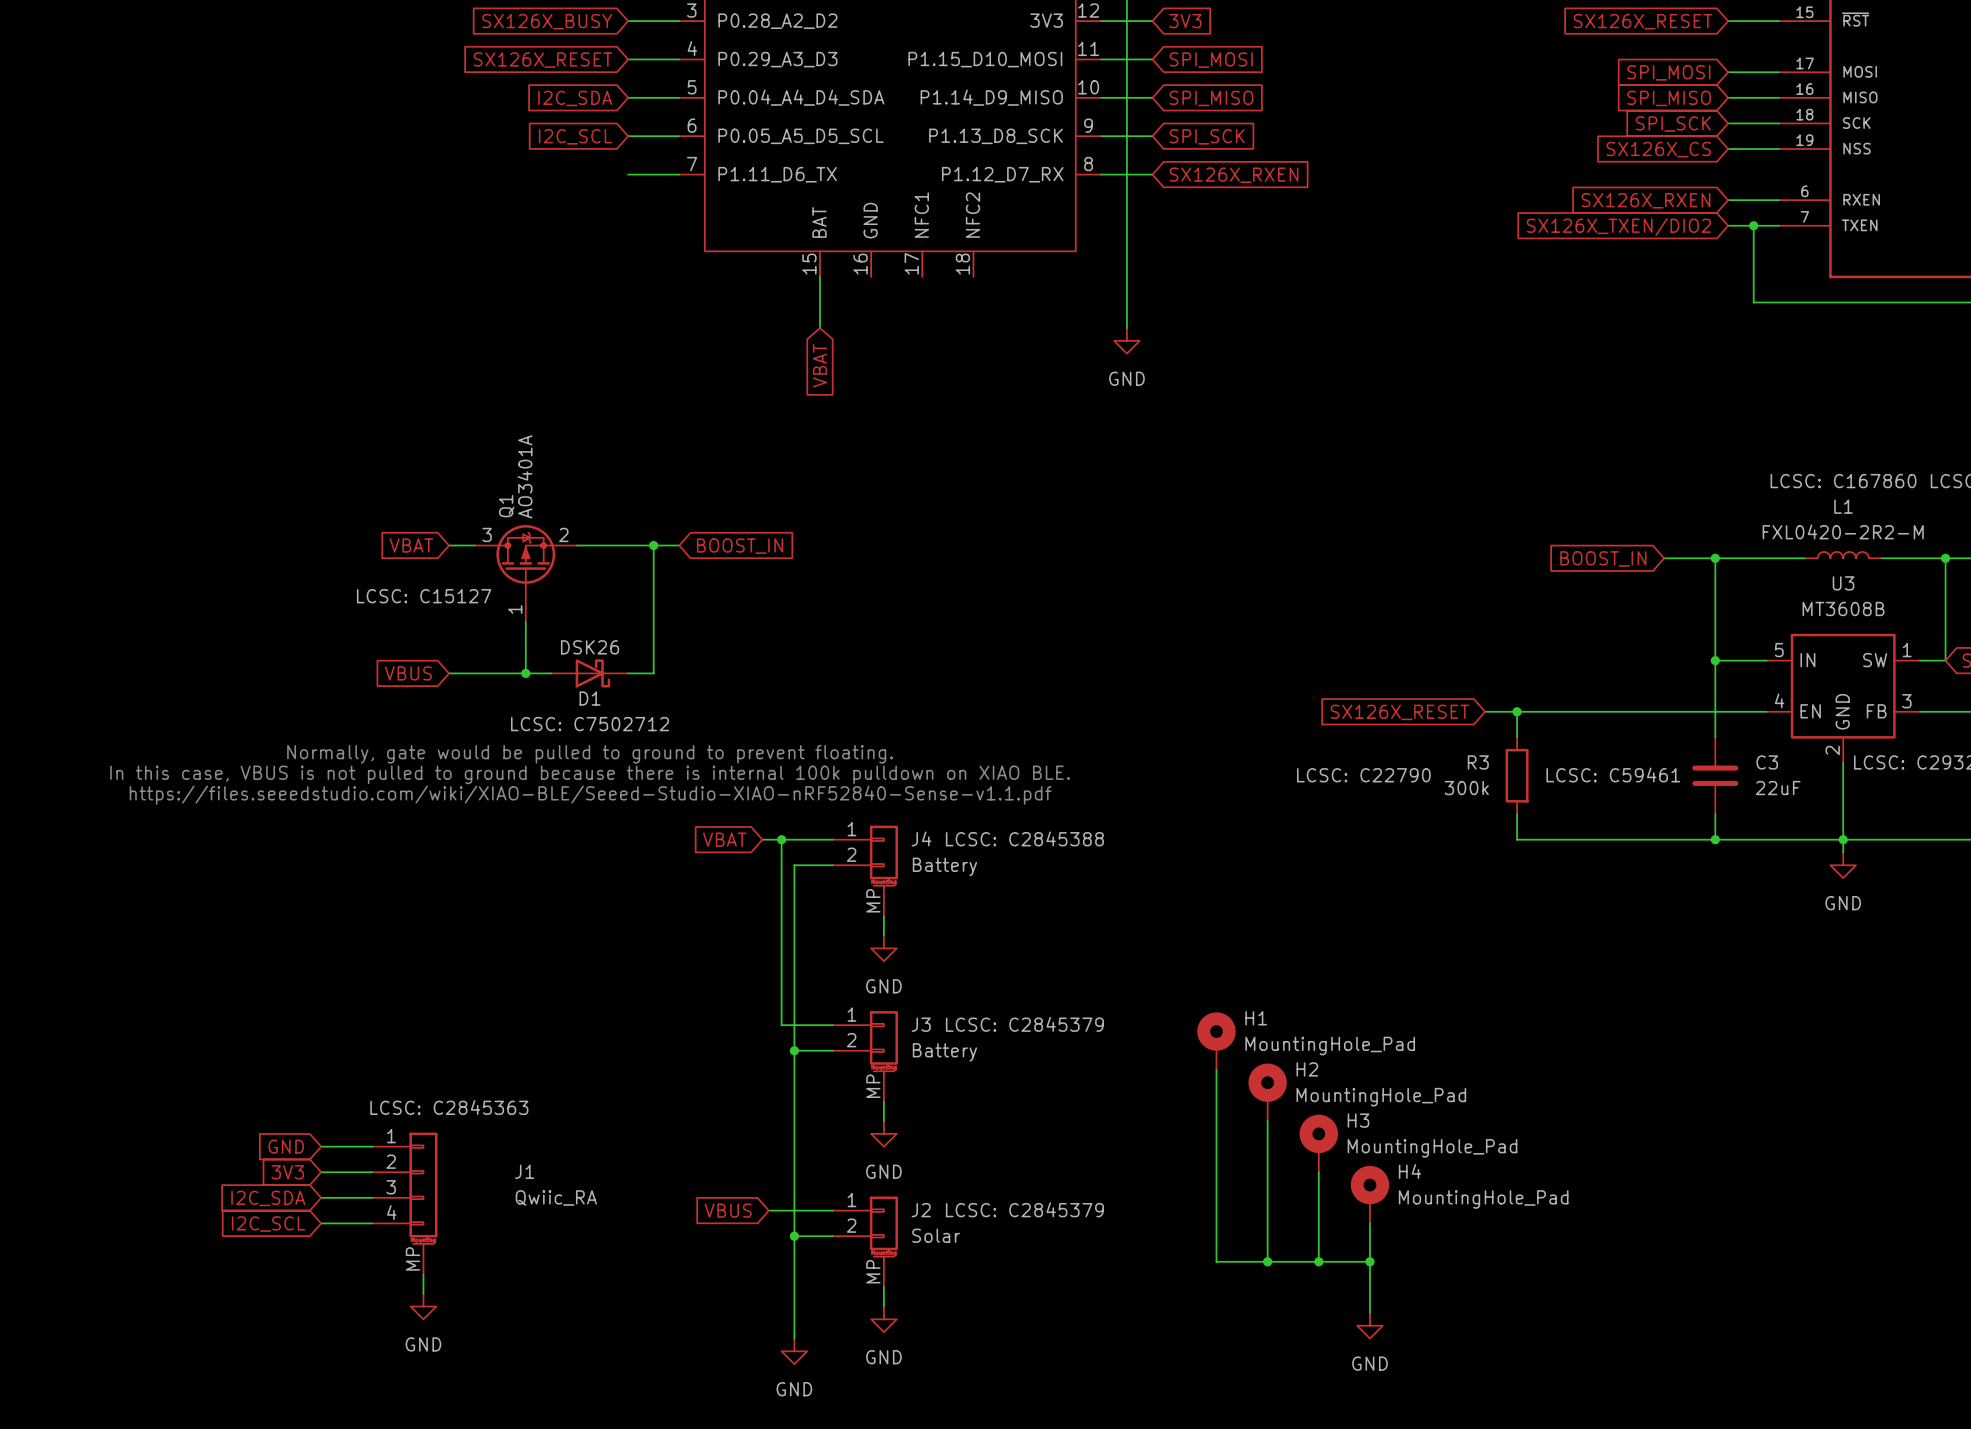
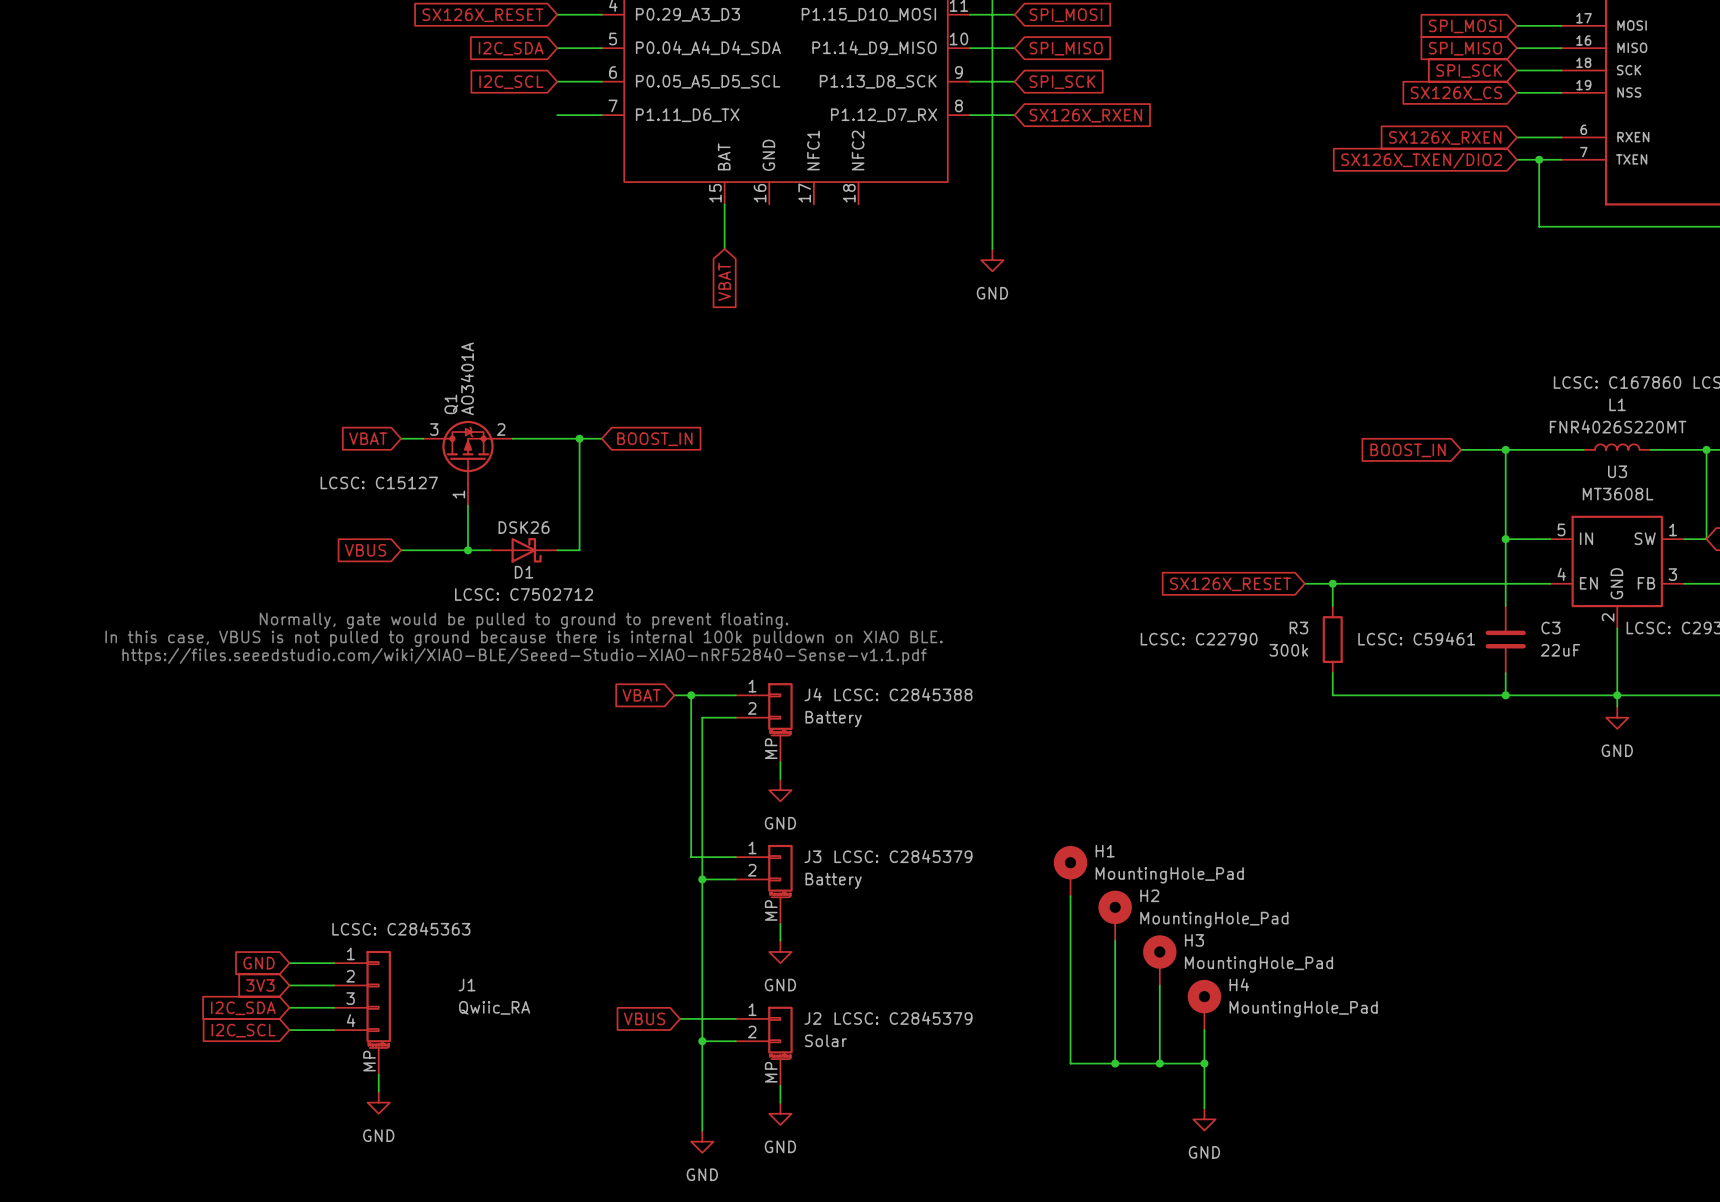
L1 value: FXL0420-2R2-M (1843, 531) -> FNR4026S220MT (1618, 426)
U3 value: MT3608B (1843, 608) -> MT3608L (1618, 494)

